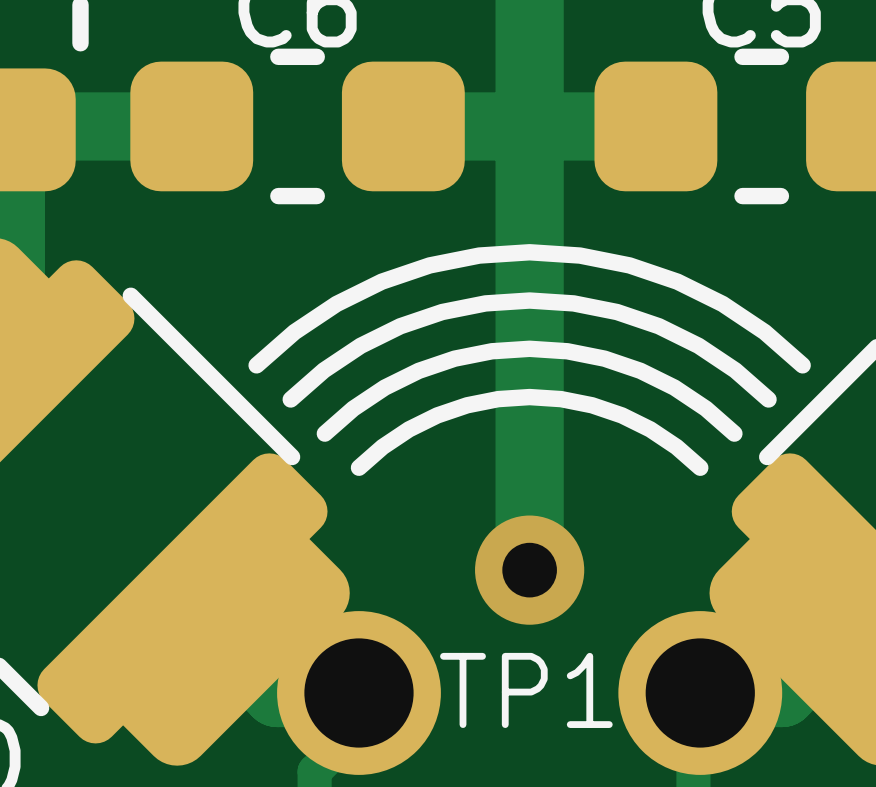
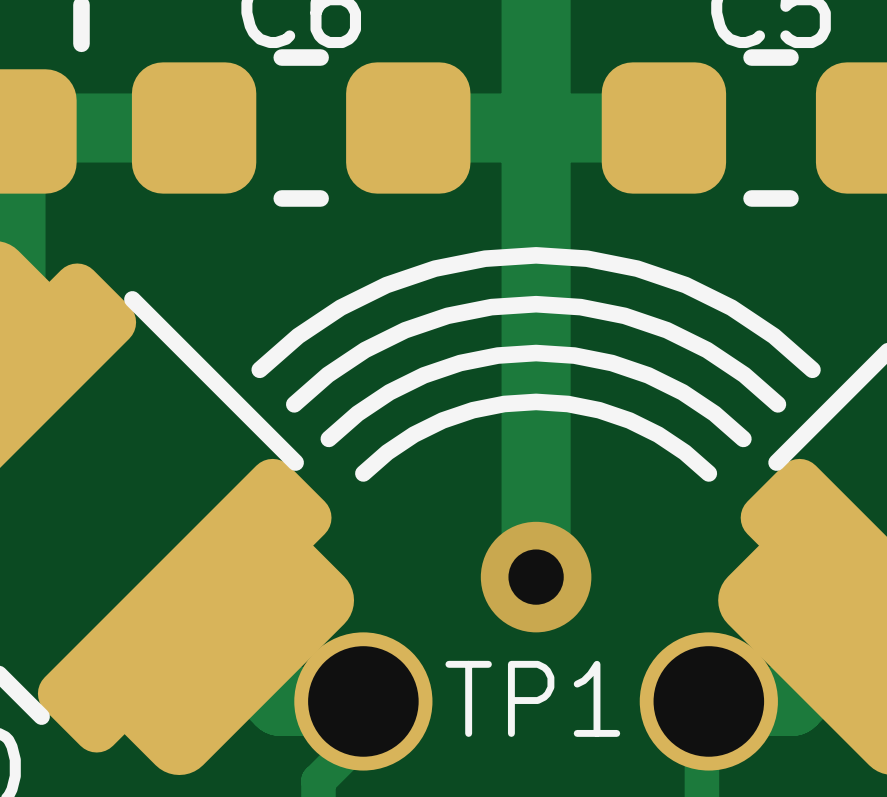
TP1 footprint: [277, 611, 783, 775] -> [294, 632, 778, 771]

